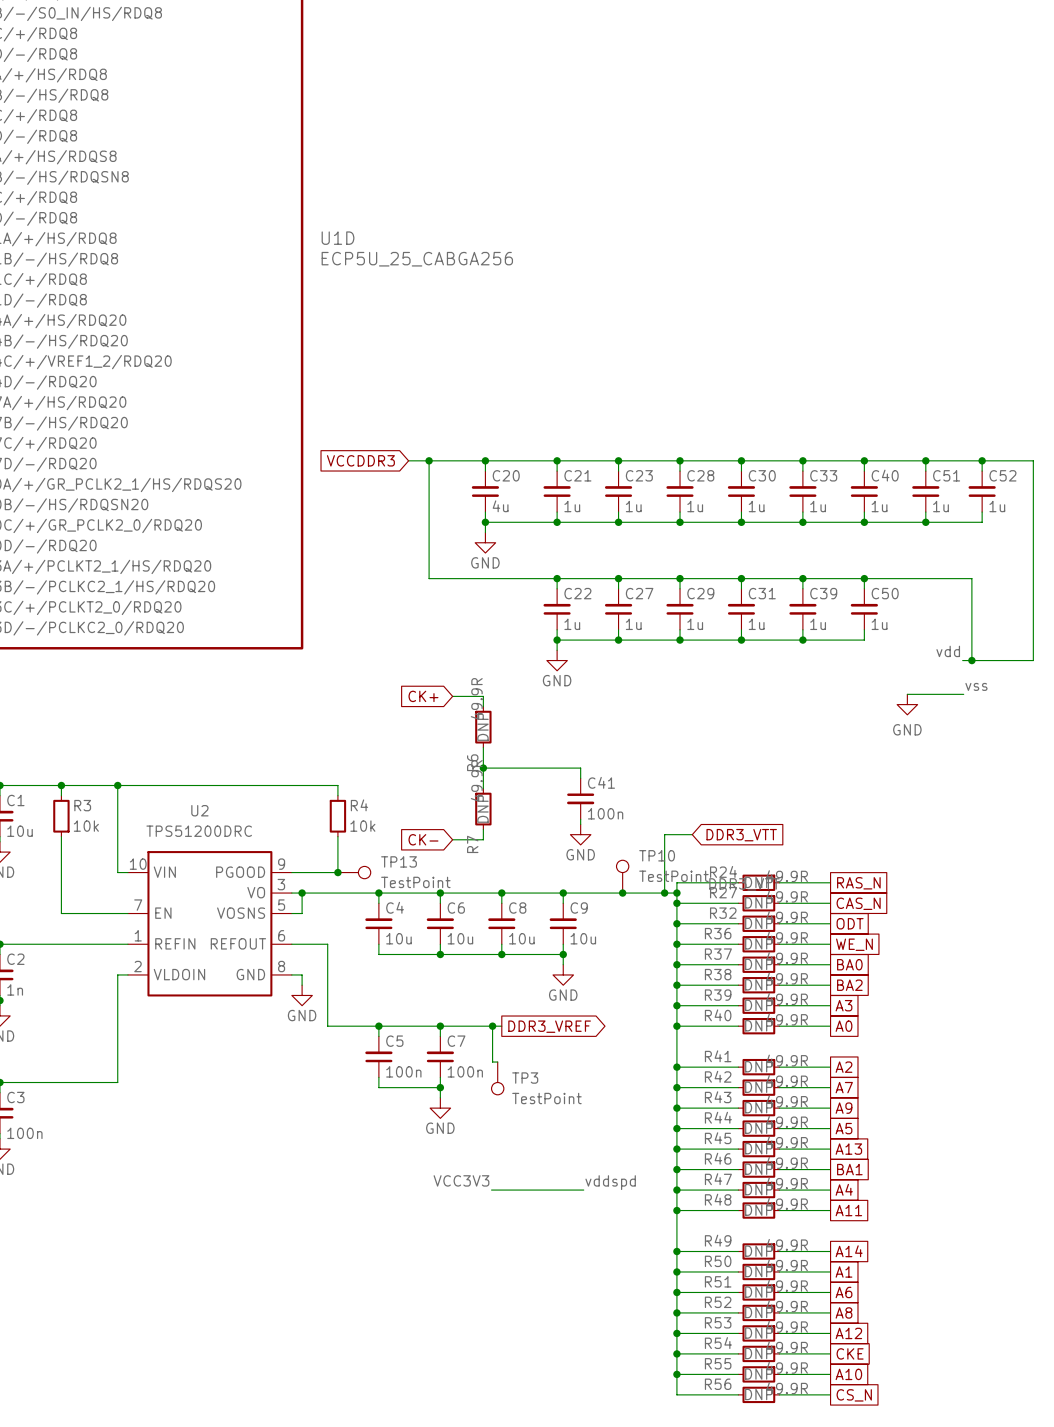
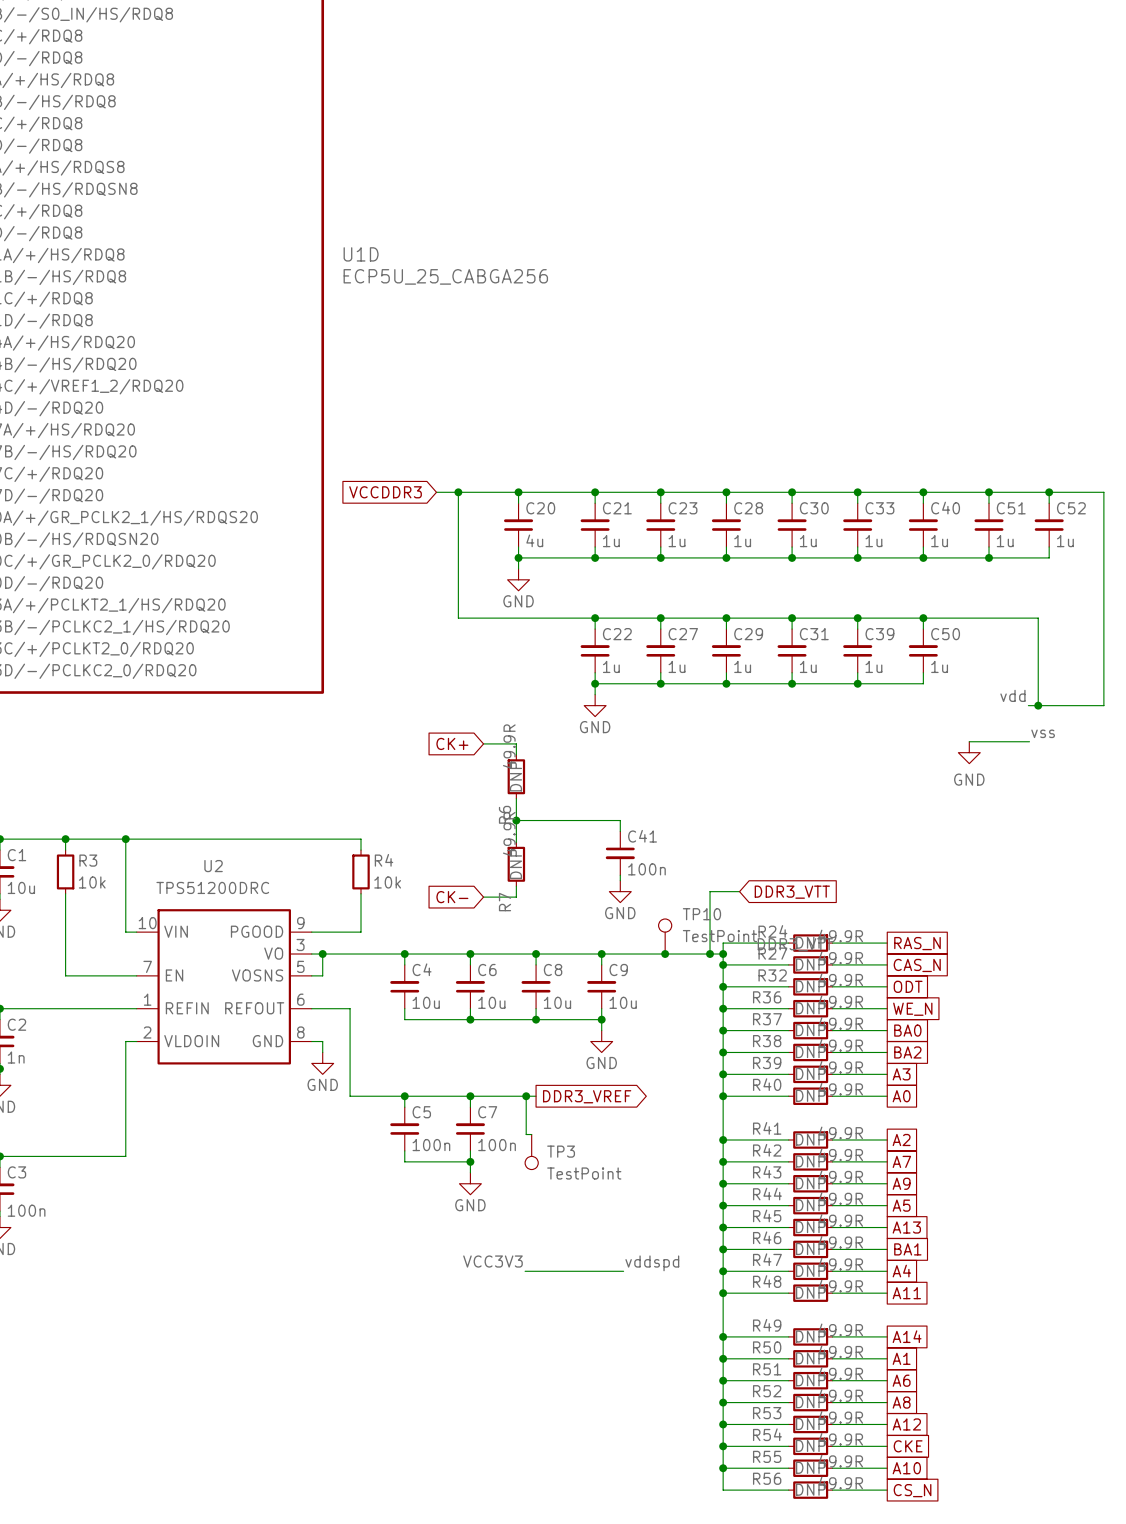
junction: (337, 872) -> none
TP13: TestPoint (354, 872) -> none

